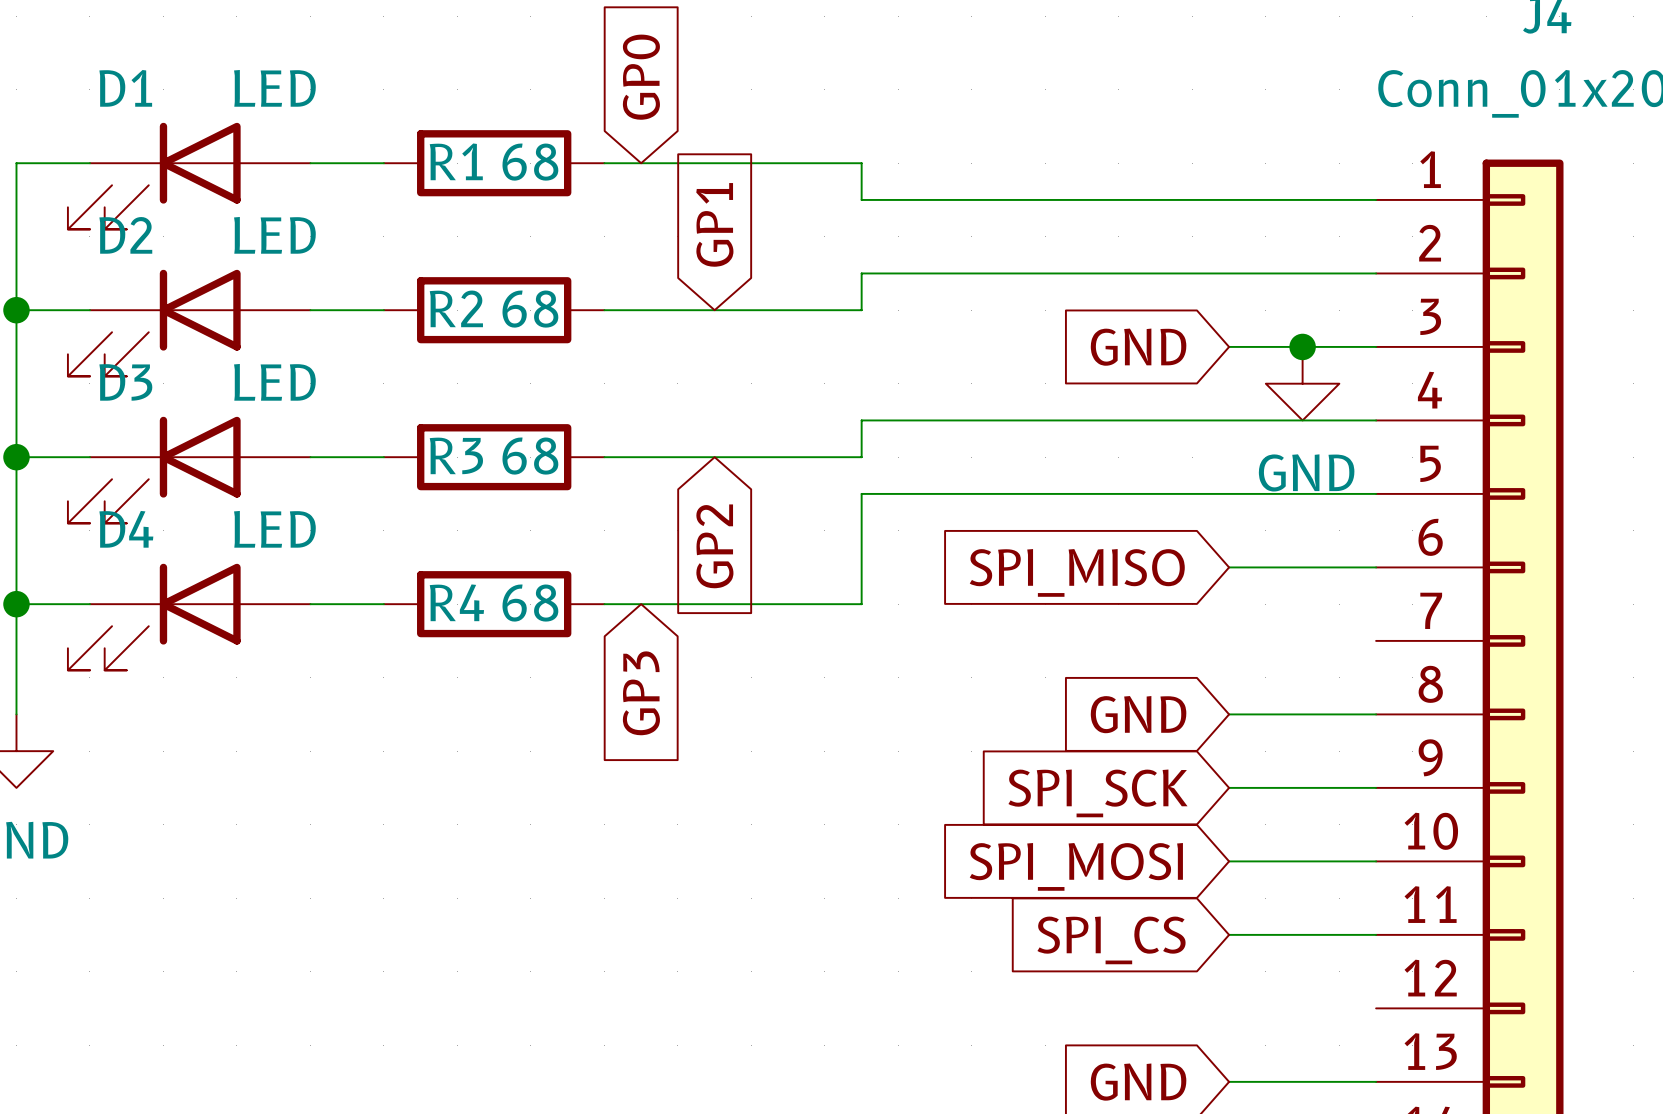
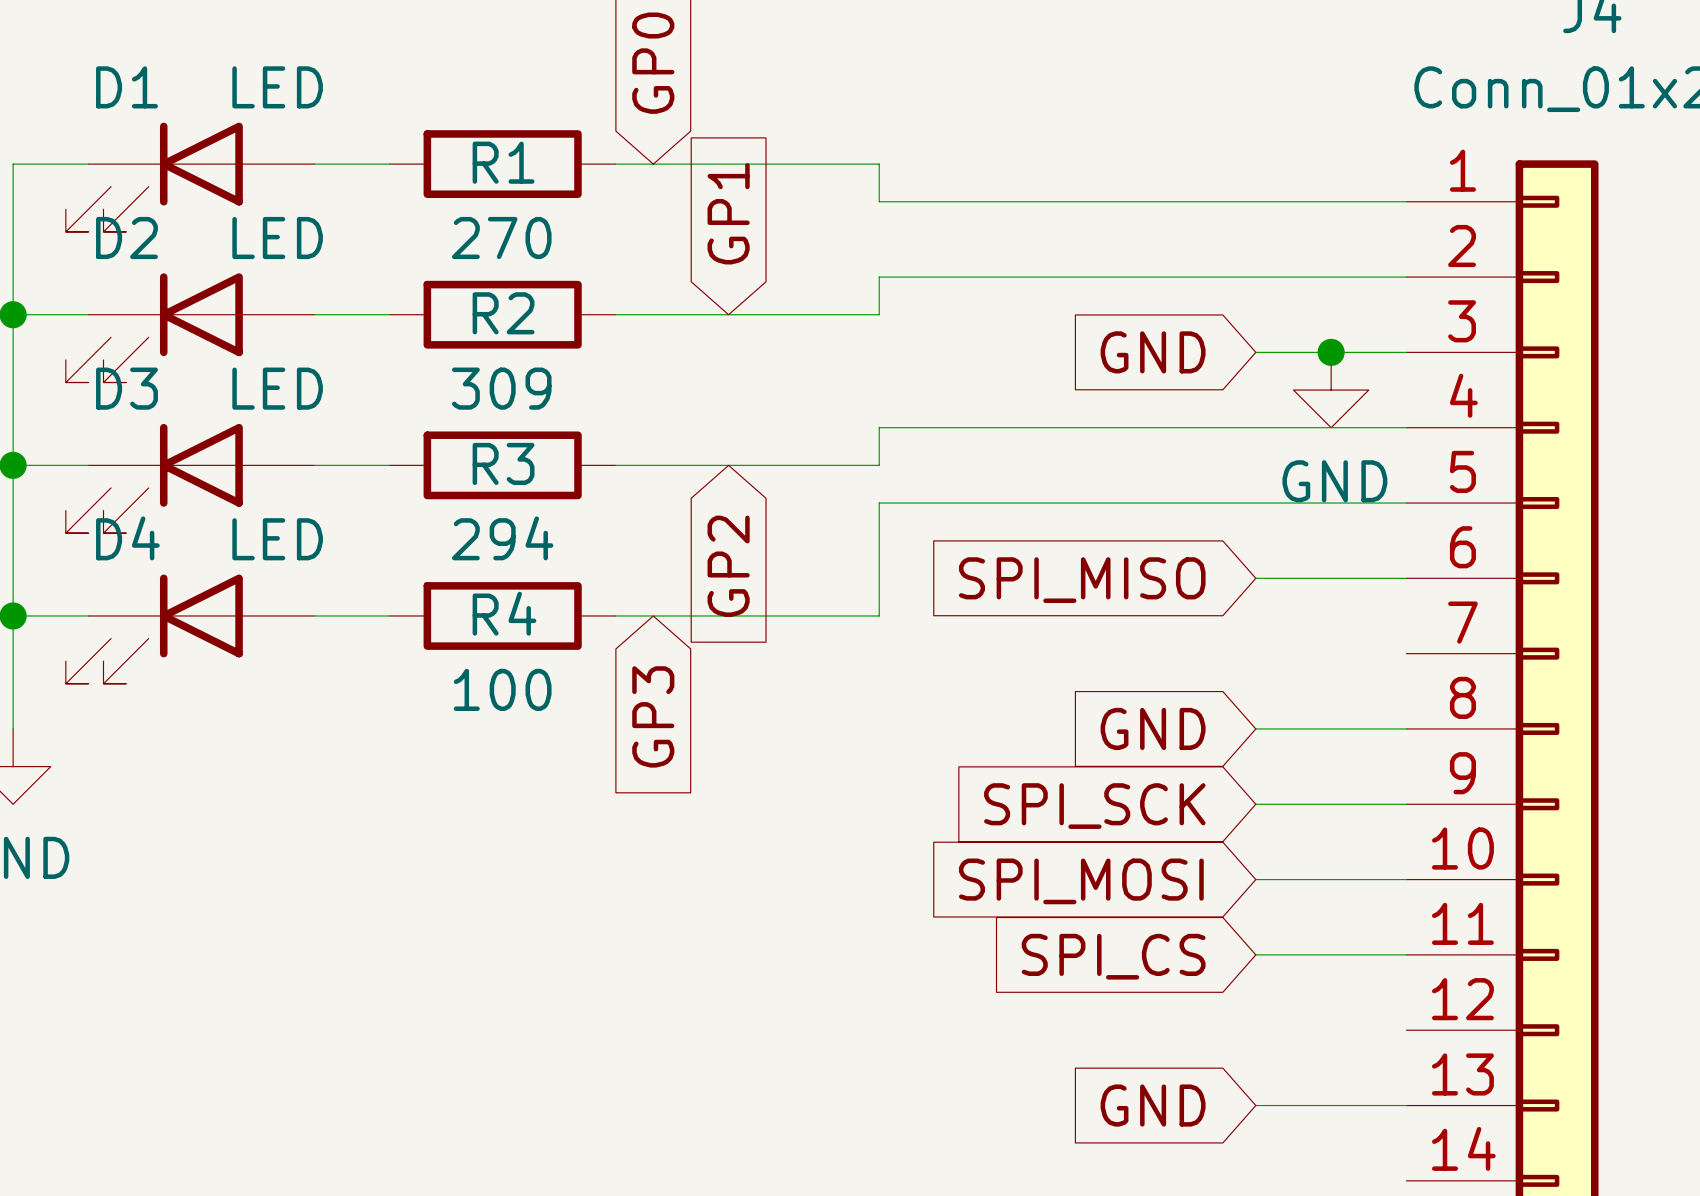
R1 name position: R1 (456, 161) -> R1 (503, 162)
R1 value: 68 (530, 162) -> 270 (501, 238)
R2 name position: R2 (456, 308) -> R2 (503, 313)
R2 value: 68 (530, 309) -> 309 (501, 388)
R3 name position: R3 (456, 455) -> R3 (503, 463)
R3 value: 68 (530, 456) -> 294 (502, 538)
R4 name position: R4 (456, 602) -> R4 (504, 613)
R4 value: 68 (530, 603) -> 100 (502, 689)

